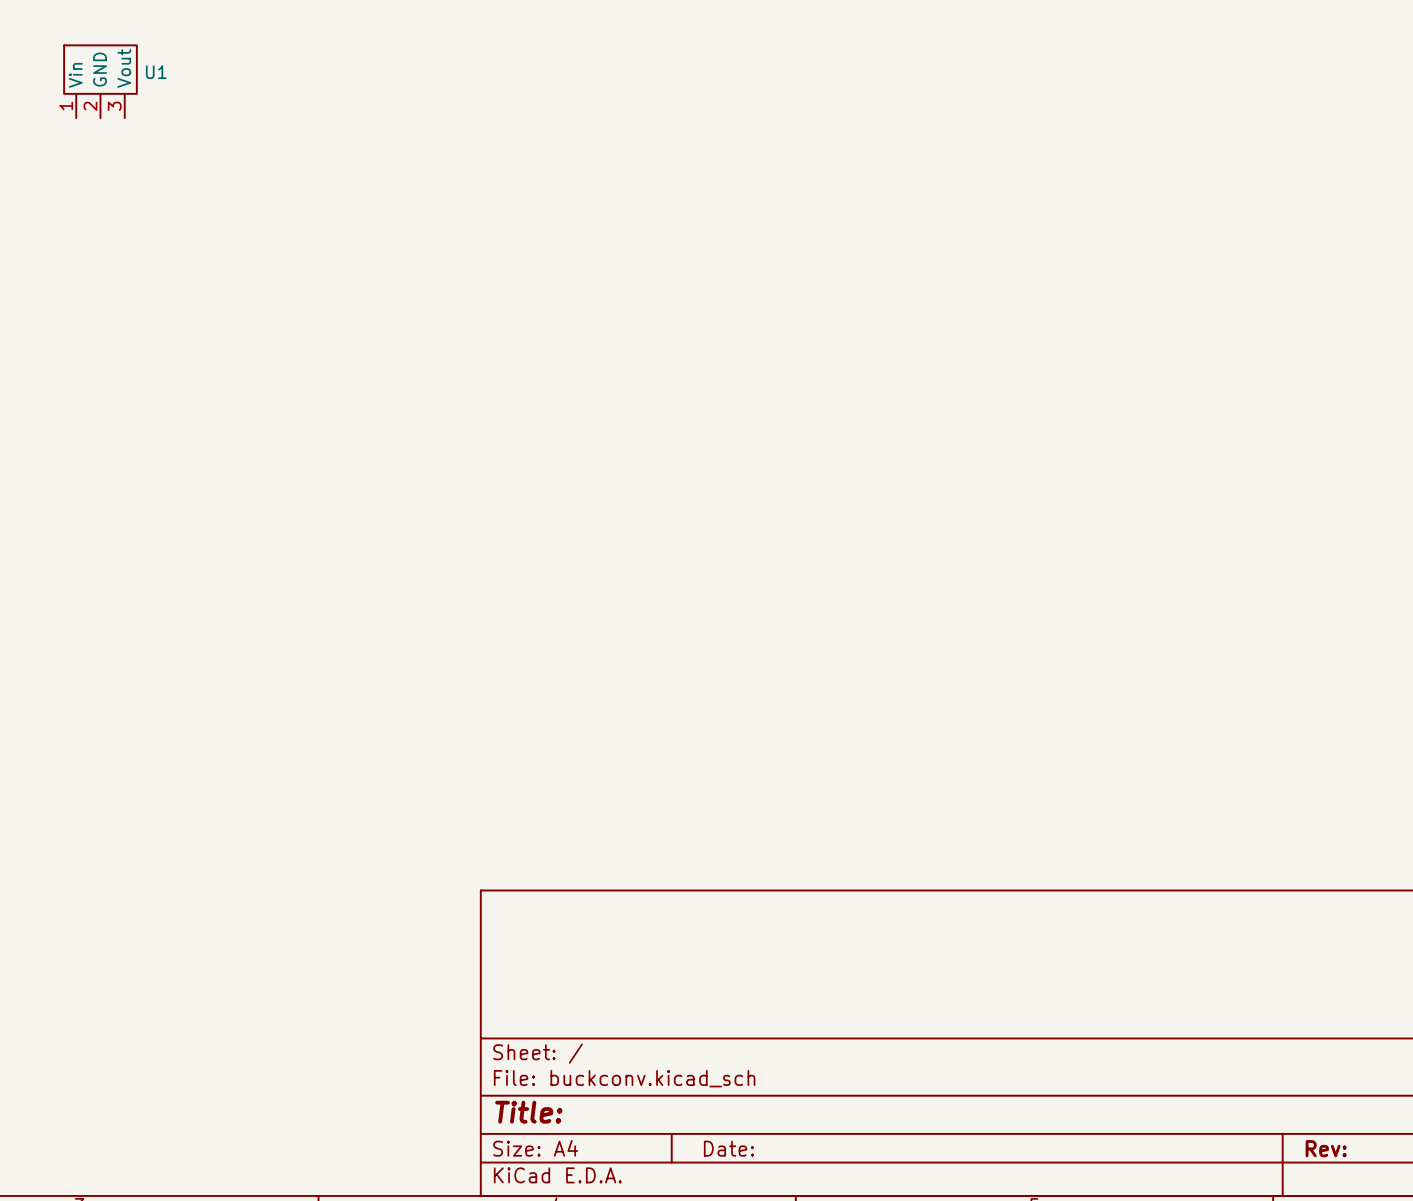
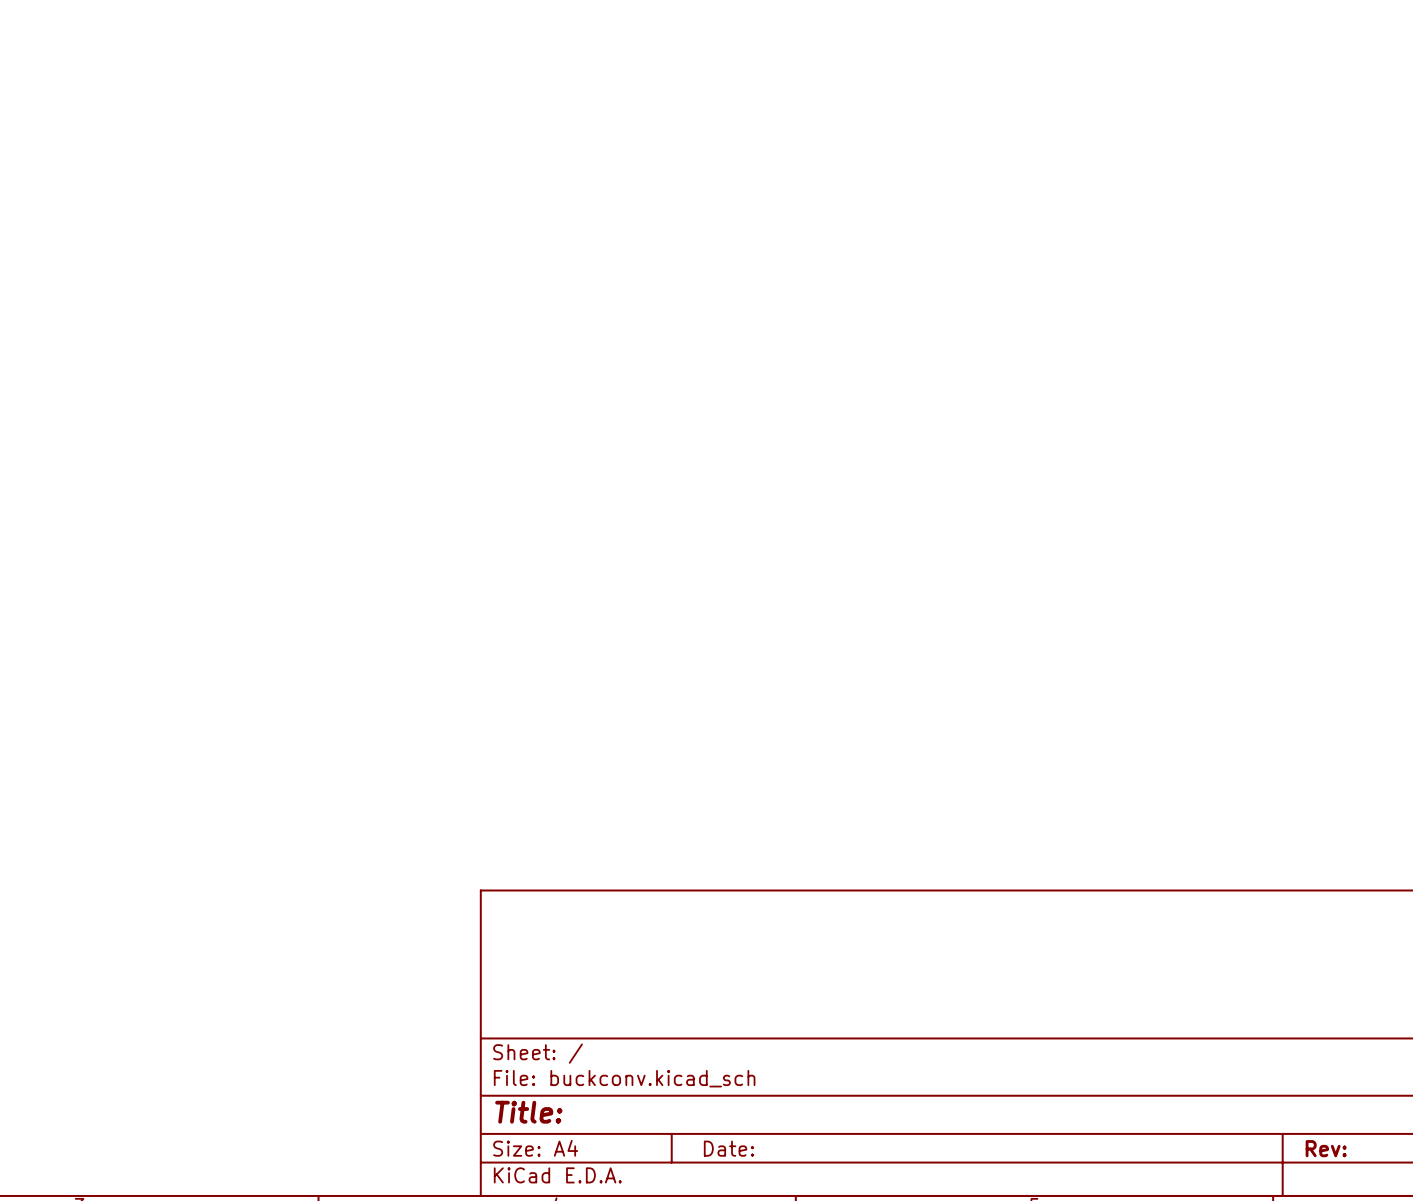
U1: (100, 81) -> none

